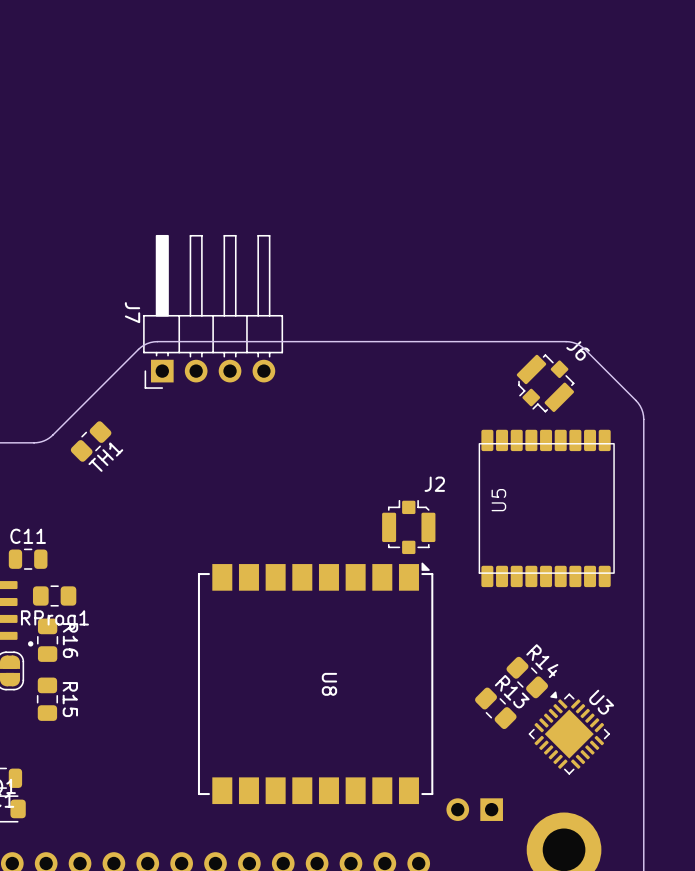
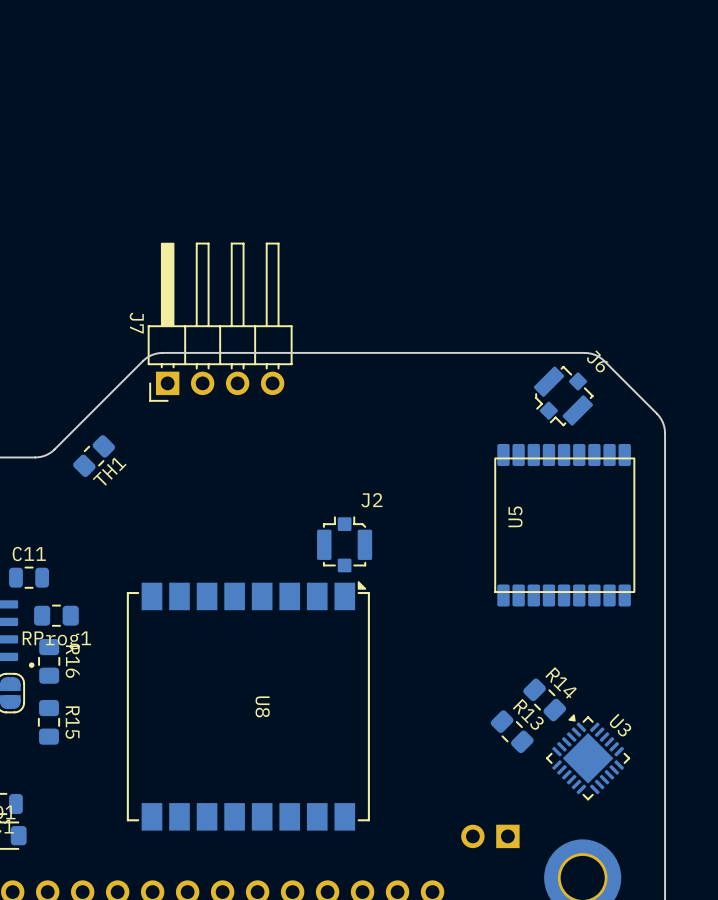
J2 position: (408, 526) -> (344, 544)
U8 position: (315, 683) -> (248, 705)

